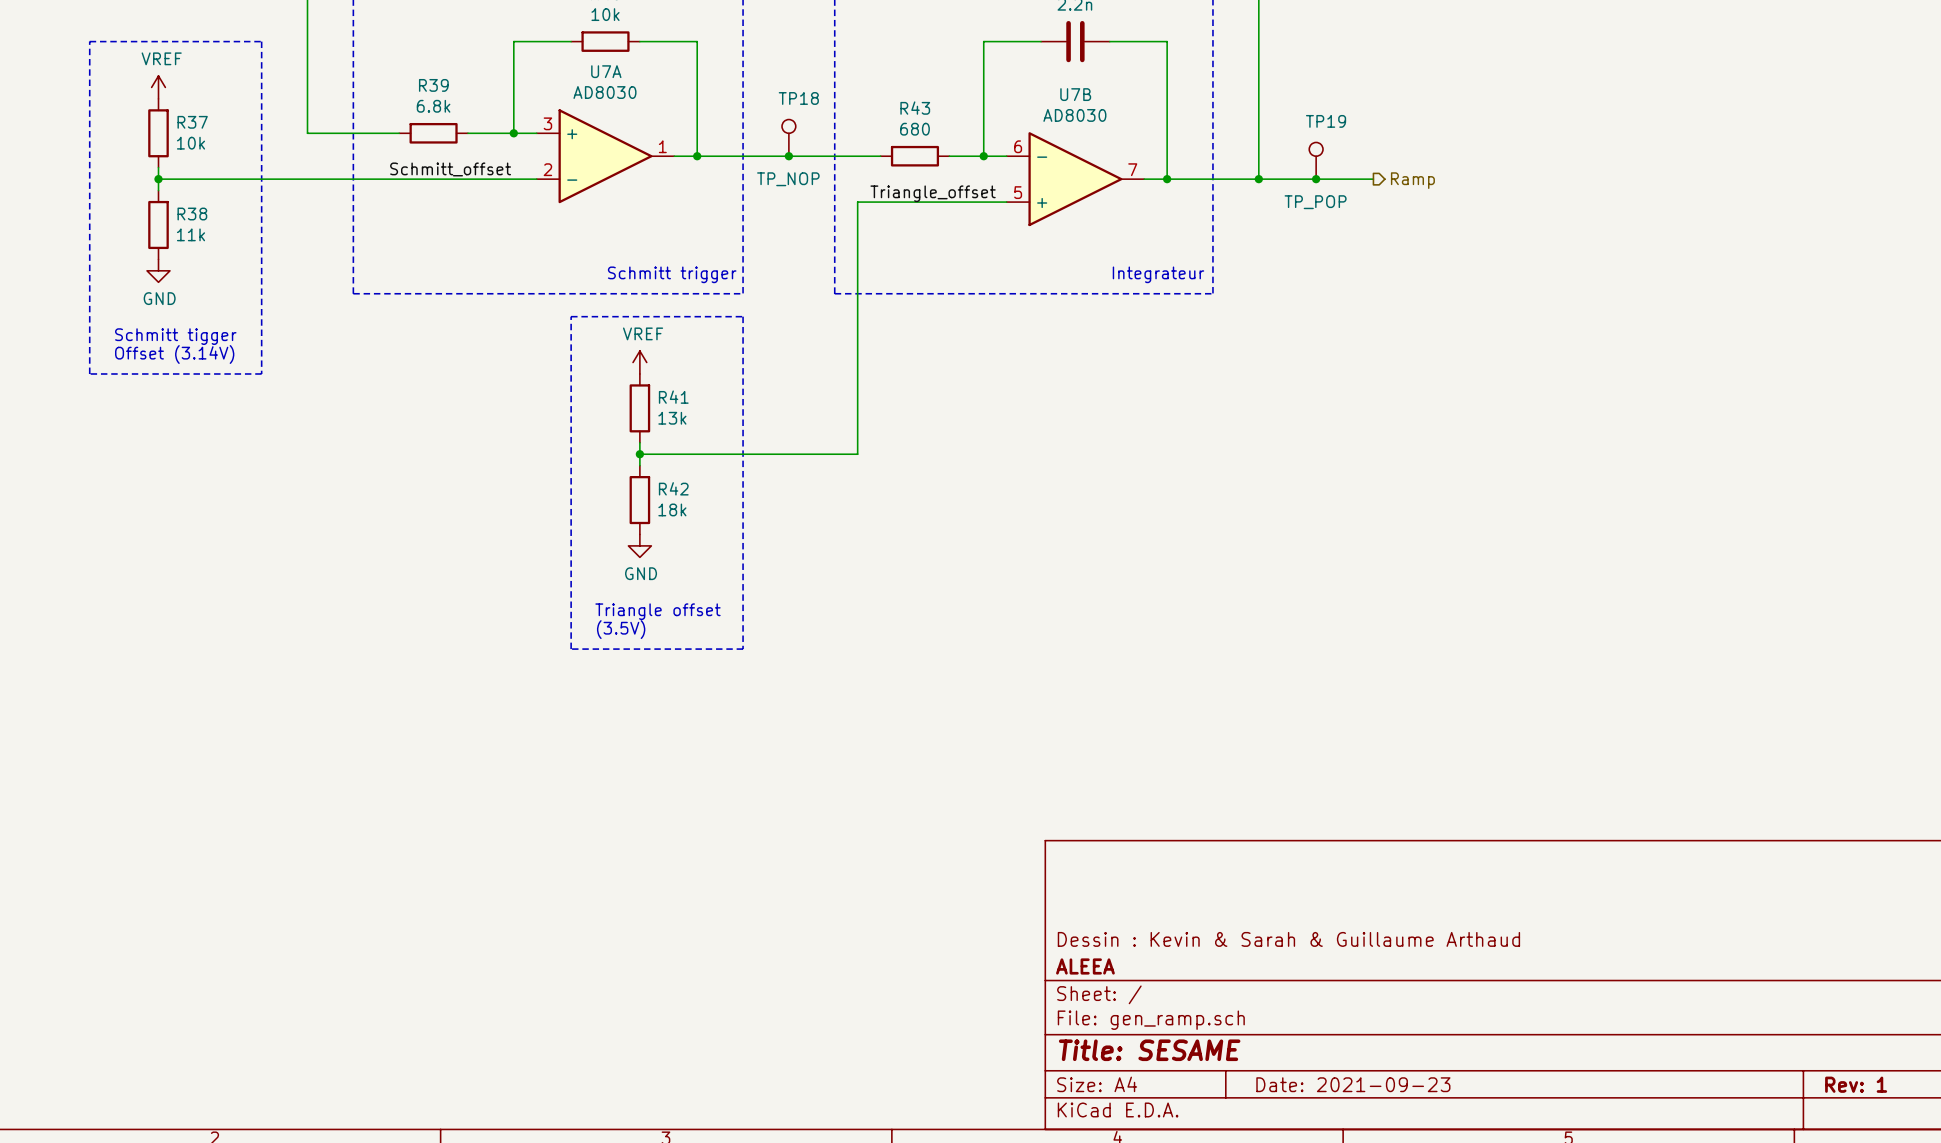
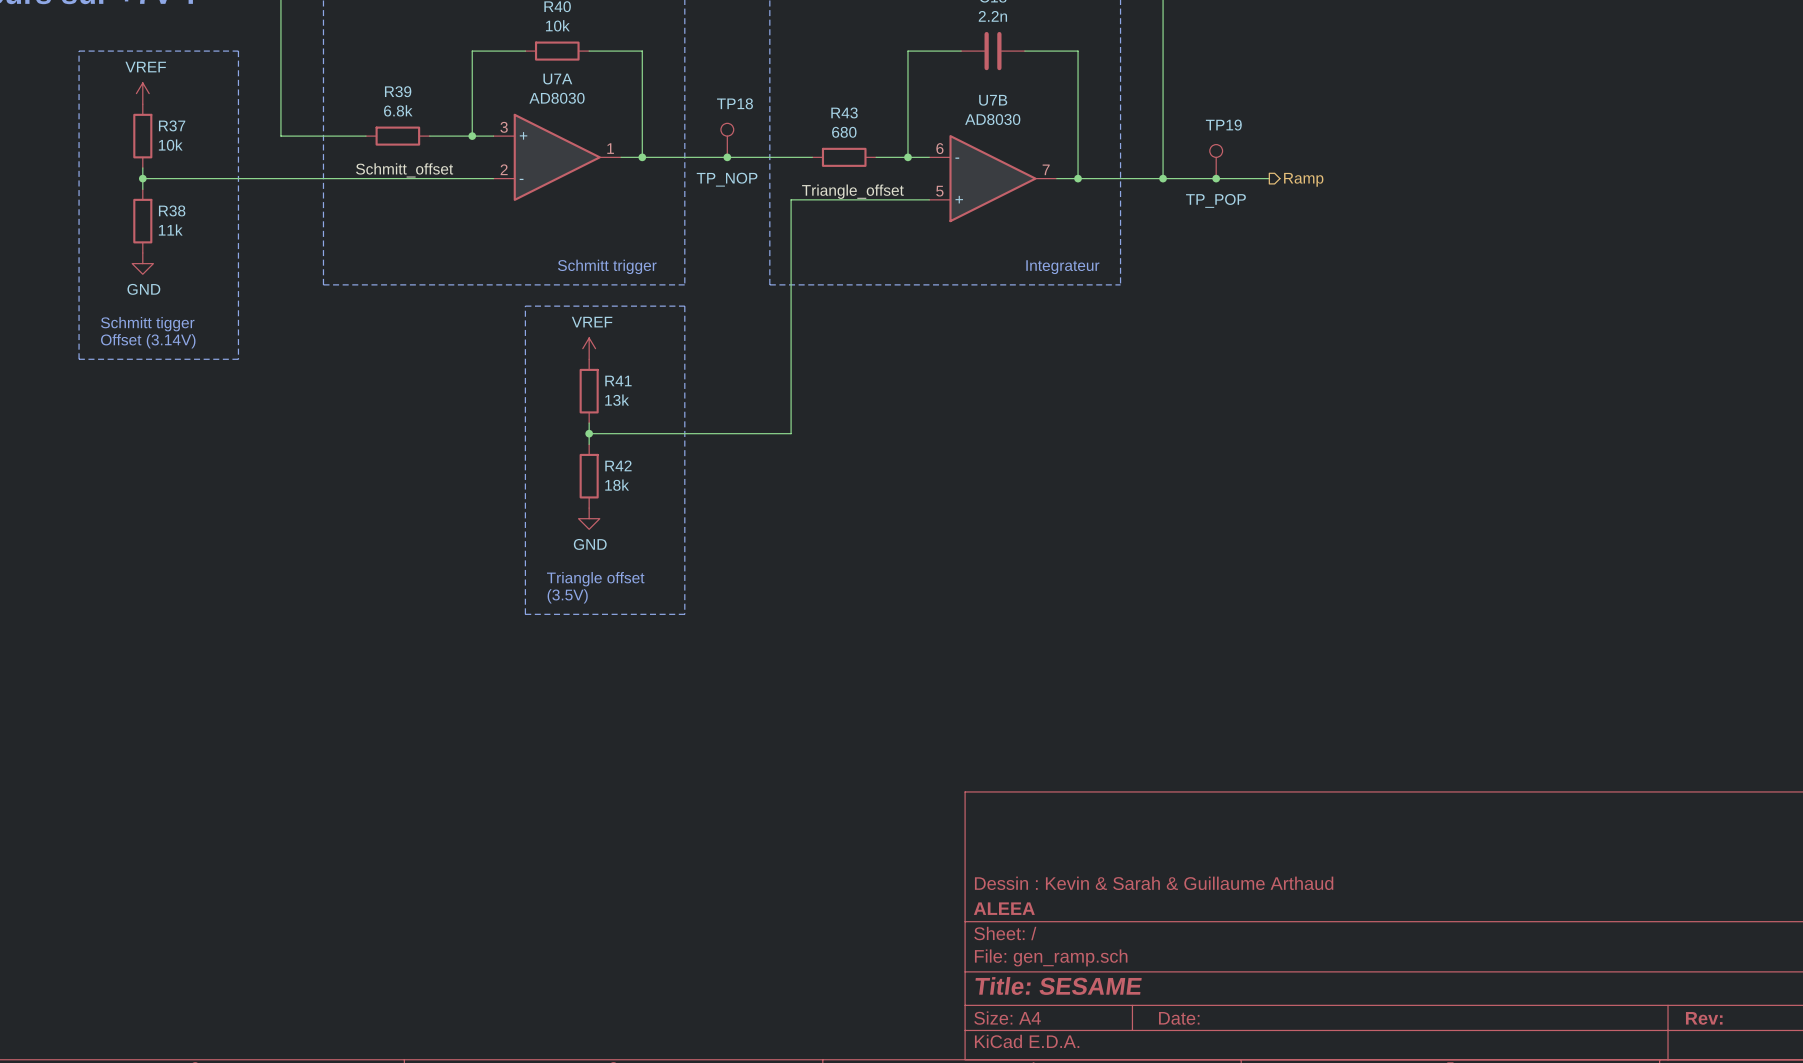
title block: Date: 2021-09-23 (1353, 1084) -> Date: (1179, 1018)
title block: Rev: 1 (1856, 1084) -> Rev: (1704, 1018)

